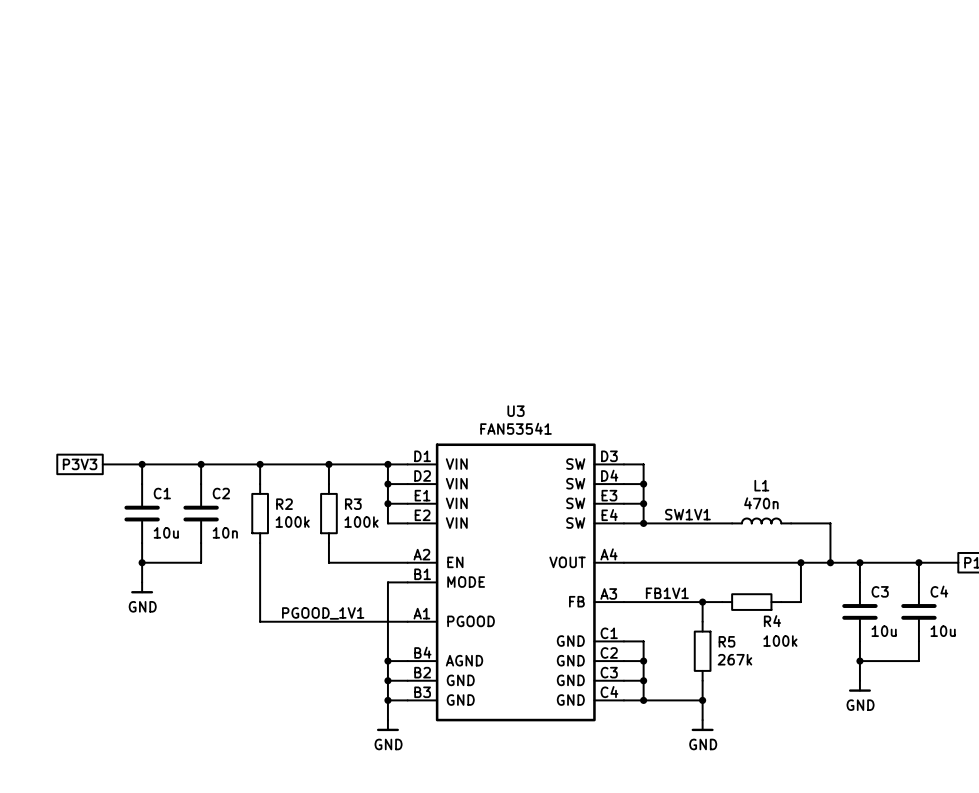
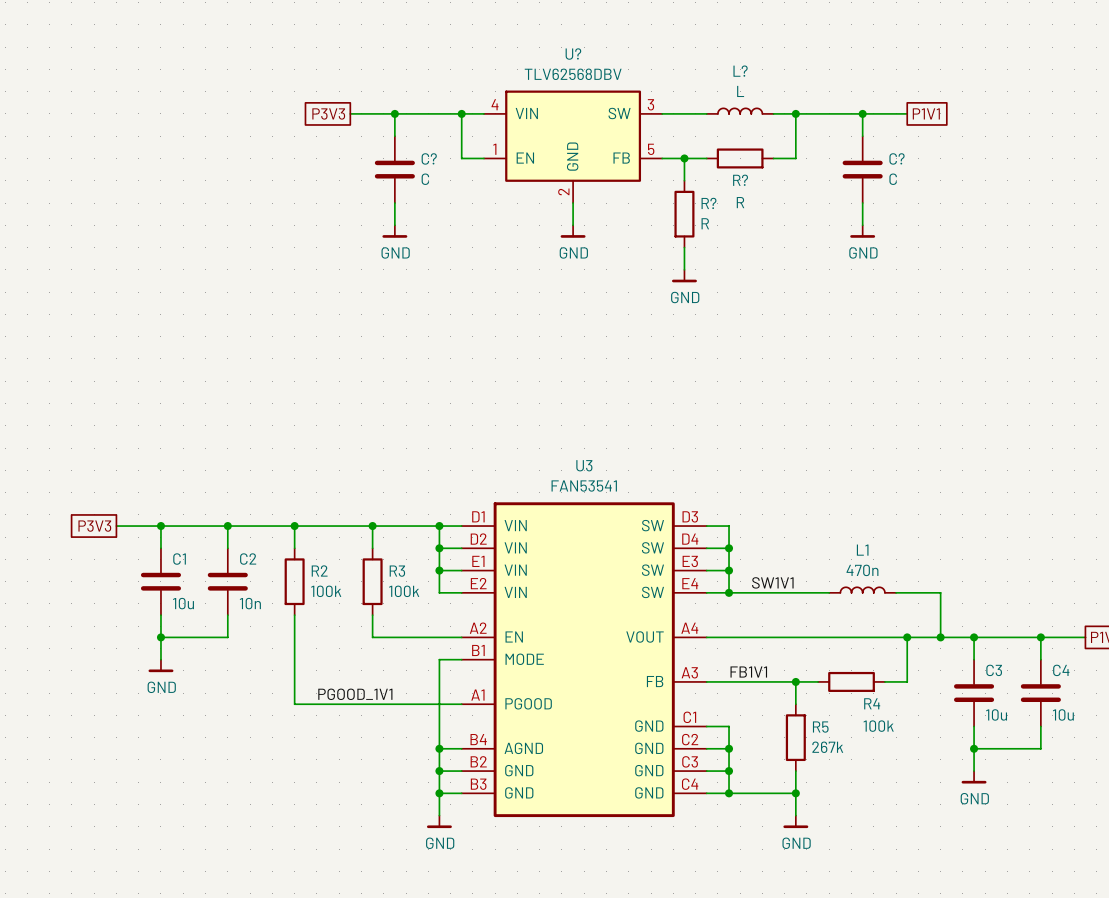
L?: none -> L (740, 111)
global label: none -> P3V3 (328, 113)
wire: none -> (350, 113) (483, 113)
wire: none -> (394, 113) (394, 136)
junction: none -> (394, 113)
wire: none -> (461, 113) (461, 158) (483, 158)
junction: none -> (461, 113)
wire: none -> (662, 113) (706, 113)
wire: none -> (773, 113) (907, 113)
wire: none -> (795, 113) (795, 158) (773, 158)
junction: none -> (795, 113)
wire: none -> (862, 113) (862, 136)
junction: none -> (862, 113)
global label: none -> P1V1 (926, 113)
U?: none -> TLV62568DBV (573, 146)
wire: none -> (662, 158) (706, 158)
wire: none -> (684, 158) (684, 180)
junction: none -> (684, 158)
R?: none -> R (740, 158)
C?: none -> C (394, 169)
C?: none -> C (862, 169)
wire: none -> (394, 203) (394, 225)
wire: none -> (573, 203) (573, 225)
wire: none -> (862, 203) (862, 225)
R?: none -> R (684, 214)
power symbol: none -> GND (394, 231)
power symbol: none -> GND (573, 231)
power symbol: none -> GND (862, 231)
wire: none -> (684, 247) (684, 269)
power symbol: none -> GND (684, 276)

